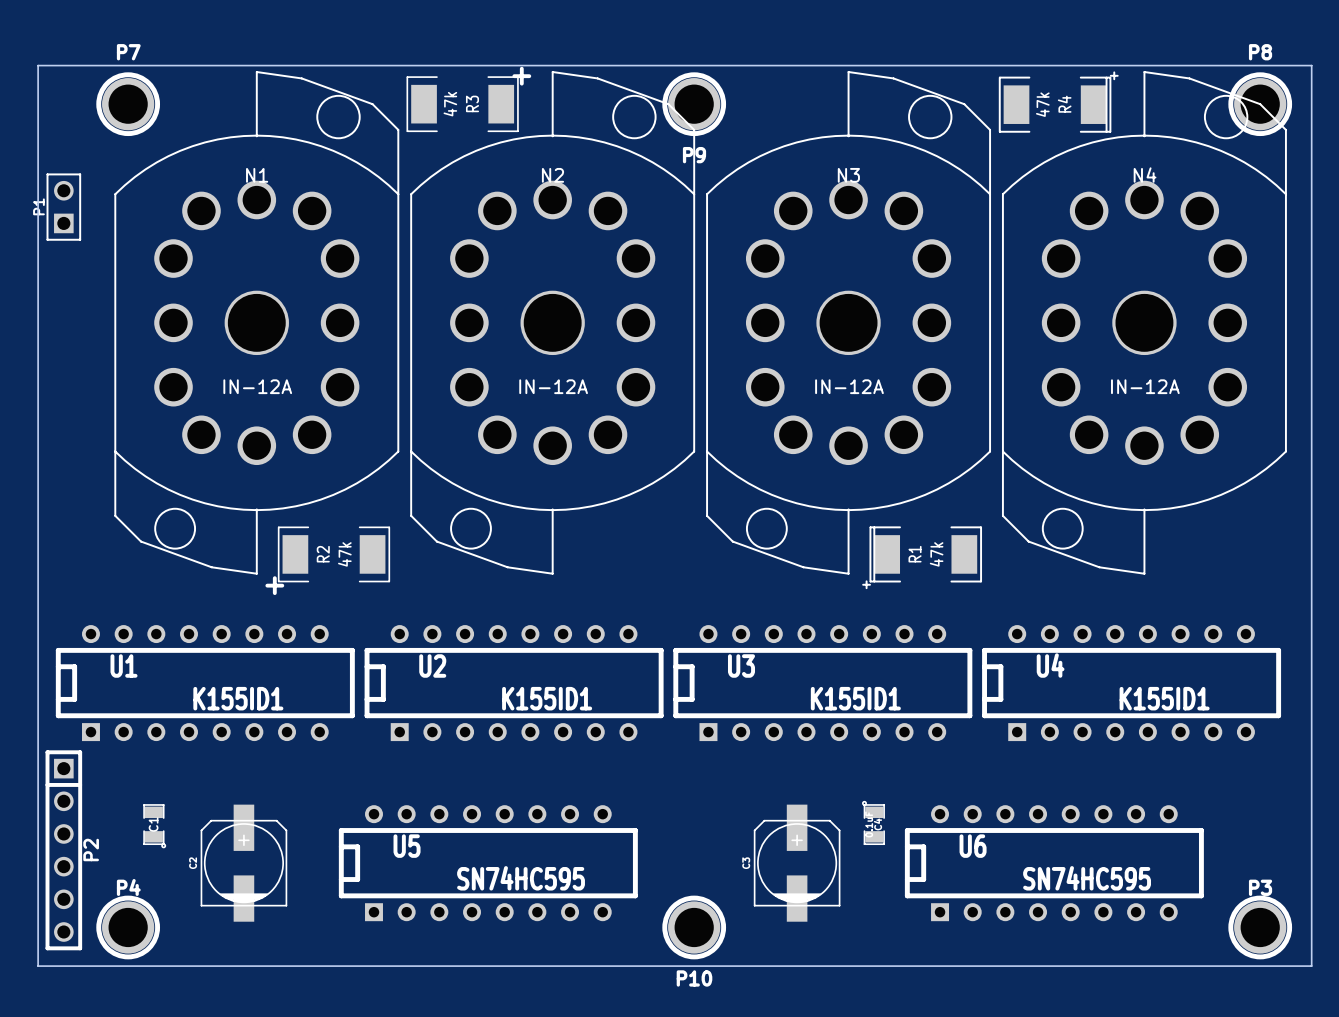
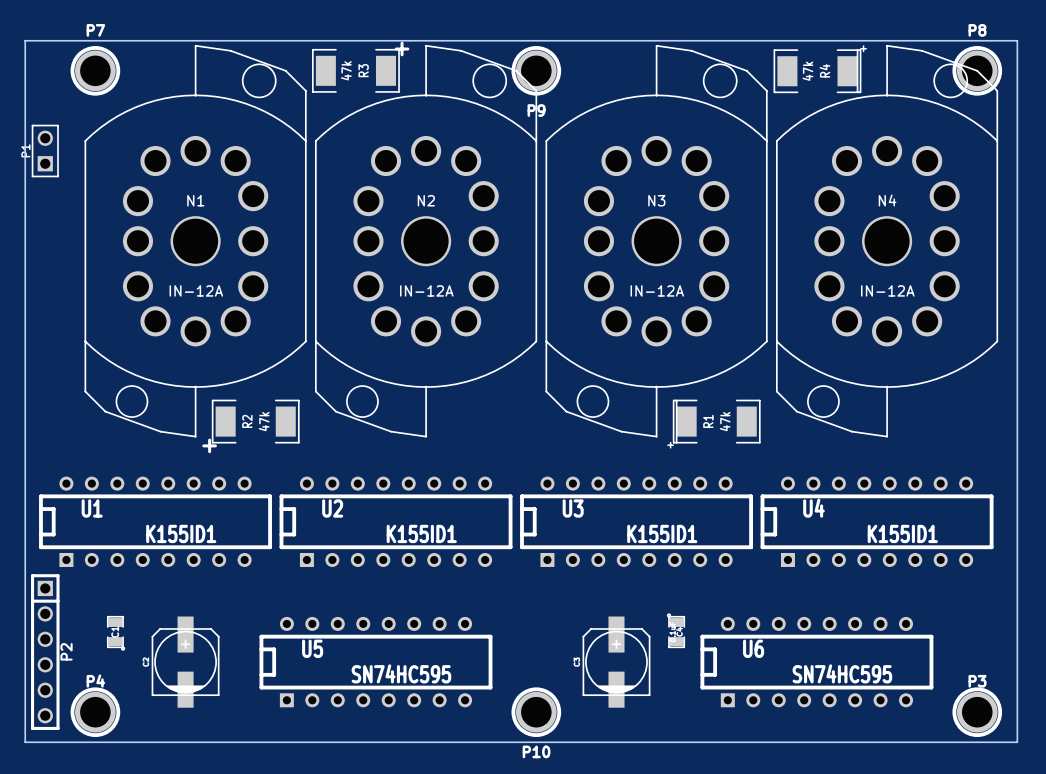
N1 footprint: [114, 71, 400, 575] -> [84, 45, 307, 438]
N2 footprint: [410, 71, 696, 575] -> [315, 45, 538, 438]
N3 footprint: [706, 71, 992, 575] -> [545, 45, 768, 438]
N4 footprint: [1001, 71, 1287, 575] -> [776, 45, 999, 438]
N1 name position: N1 (257, 175) -> N1 (195, 200)
N2 name position: N2 (552, 175) -> N2 (426, 200)
N3 name position: N3 (848, 175) -> N3 (656, 200)
N4 name position: N4 (1145, 175) -> N4 (887, 200)

